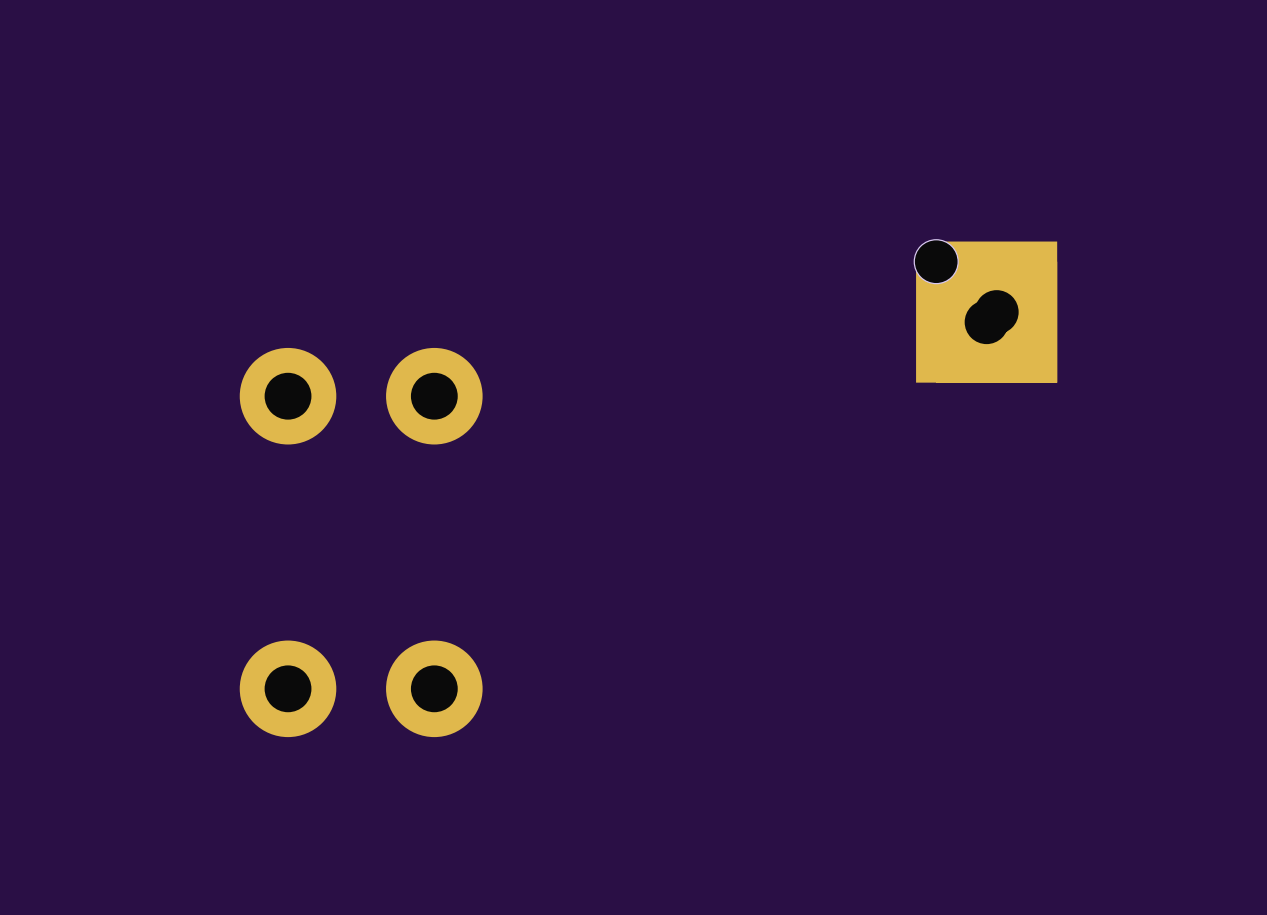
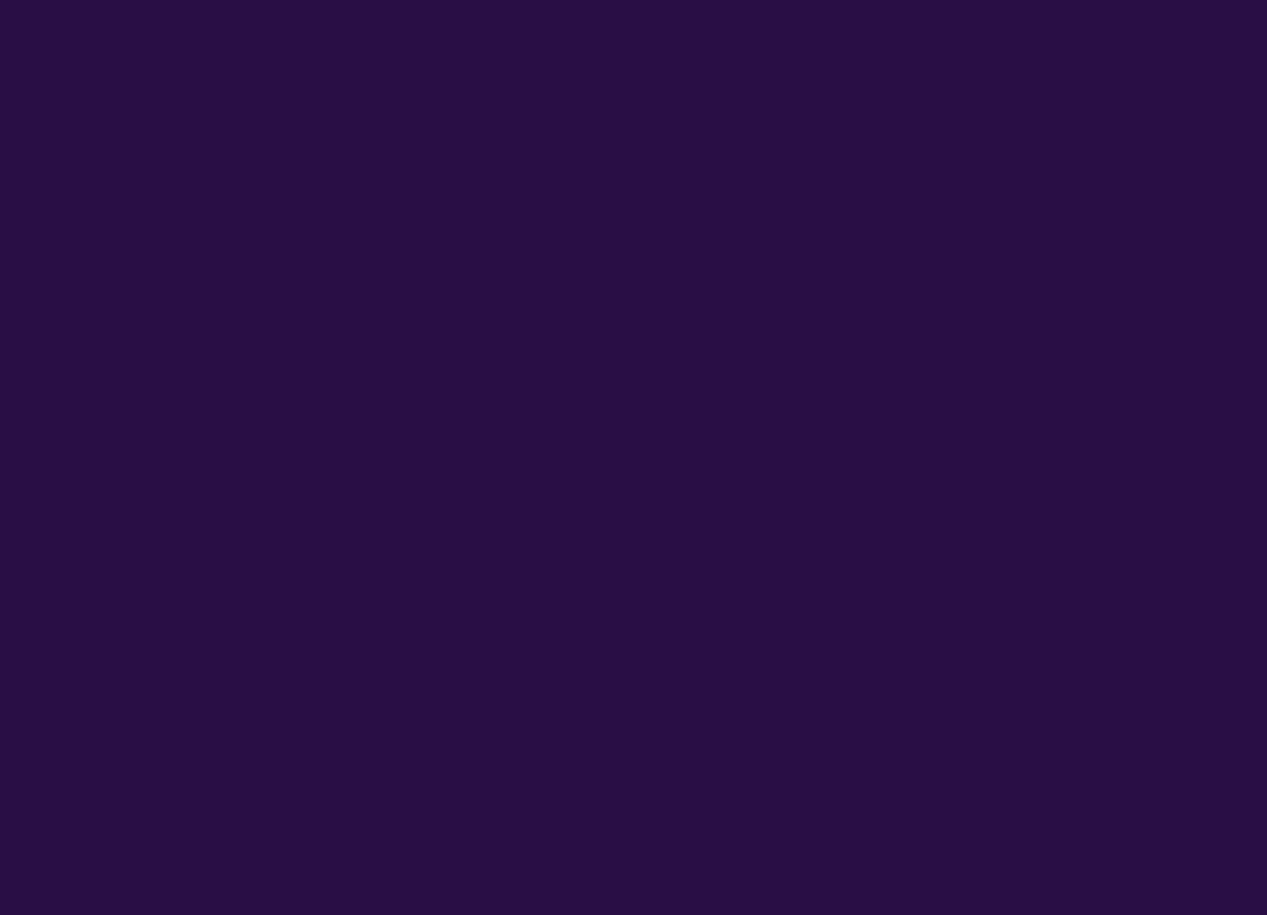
part: (985, 311) -> none
part: (361, 396) -> none
part: (361, 688) -> none

